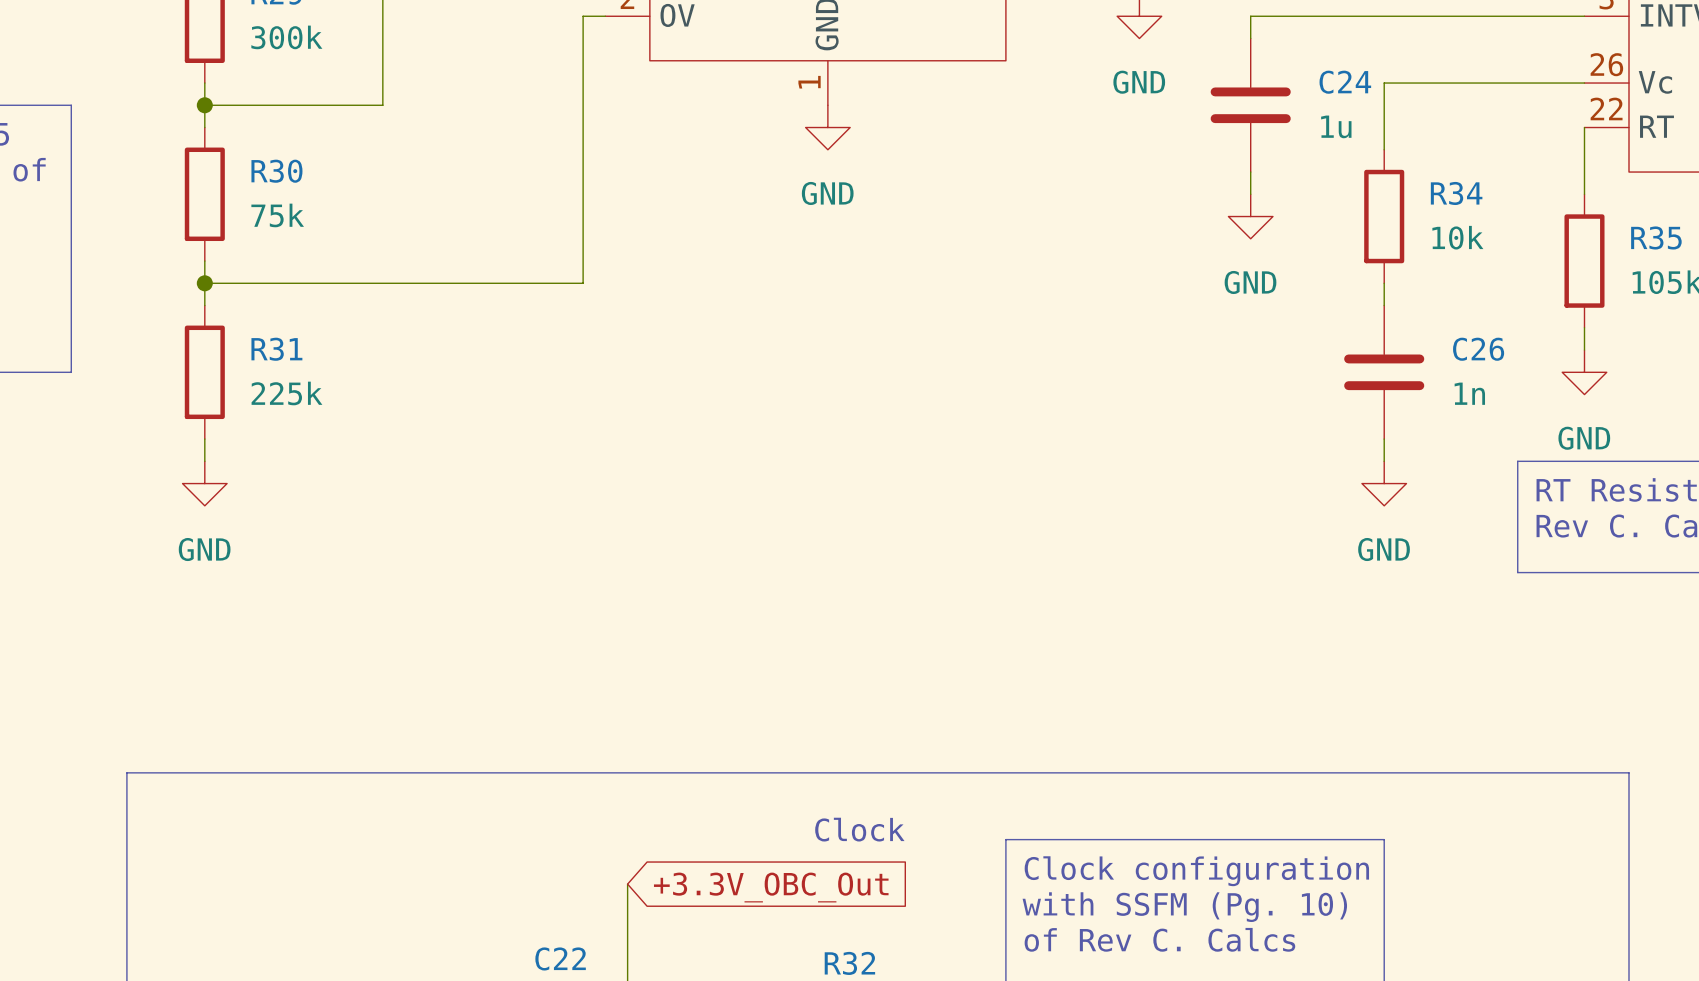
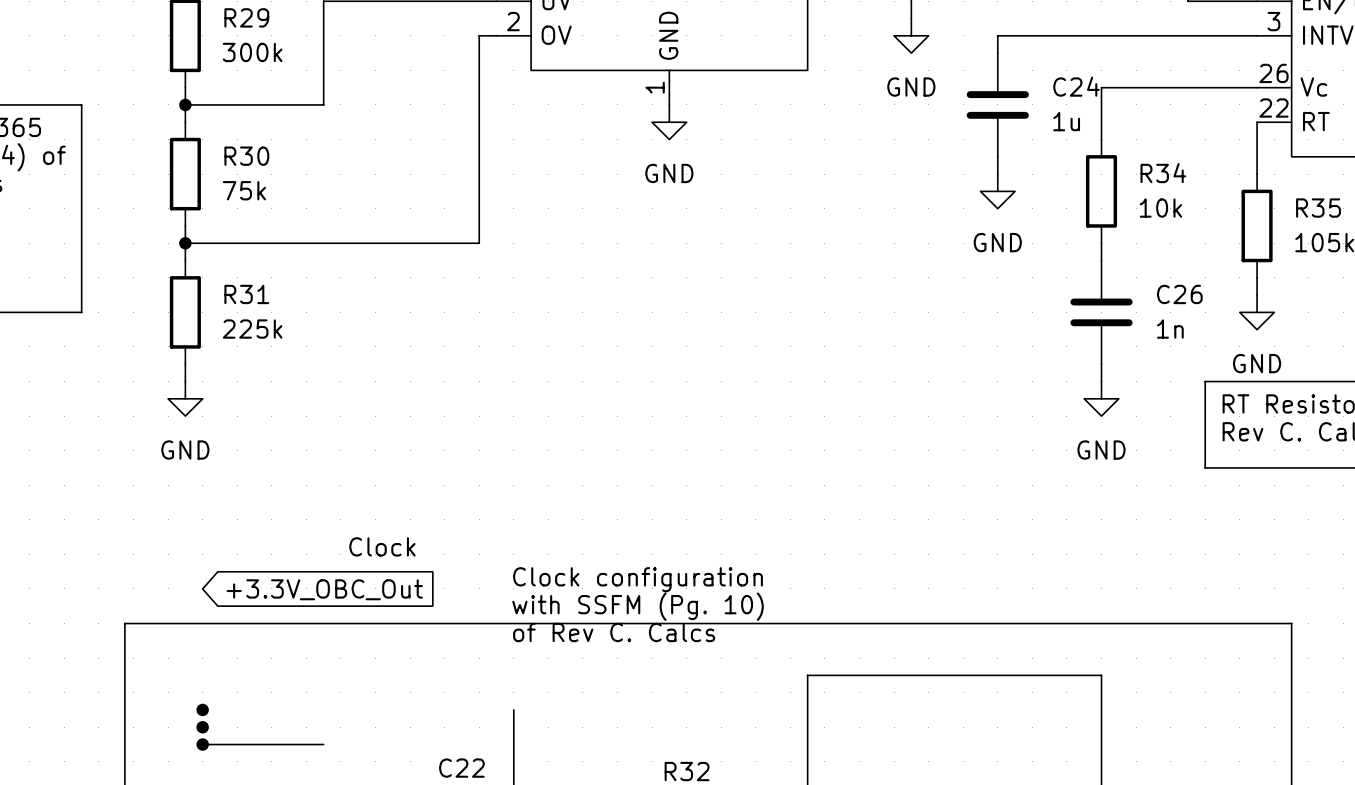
text position: Clock (859, 829) -> Clock (382, 546)
text position: Clock configuration (1196, 871) -> Clock configuration (638, 579)
junction: none -> (202, 709)
global label position: +3.3V_OBC_Out (771, 887) -> +3.3V_OBC_Out (324, 589)
junction: none -> (202, 727)
text position: with SSFM (Pg. 10) (1184, 907) -> with SSFM (Pg. 10) (638, 606)
wire: none -> (202, 744) (323, 744)
junction: none -> (202, 744)
text position: of Rev C. Calcs (1159, 939) -> of Rev C. Calcs (614, 632)

